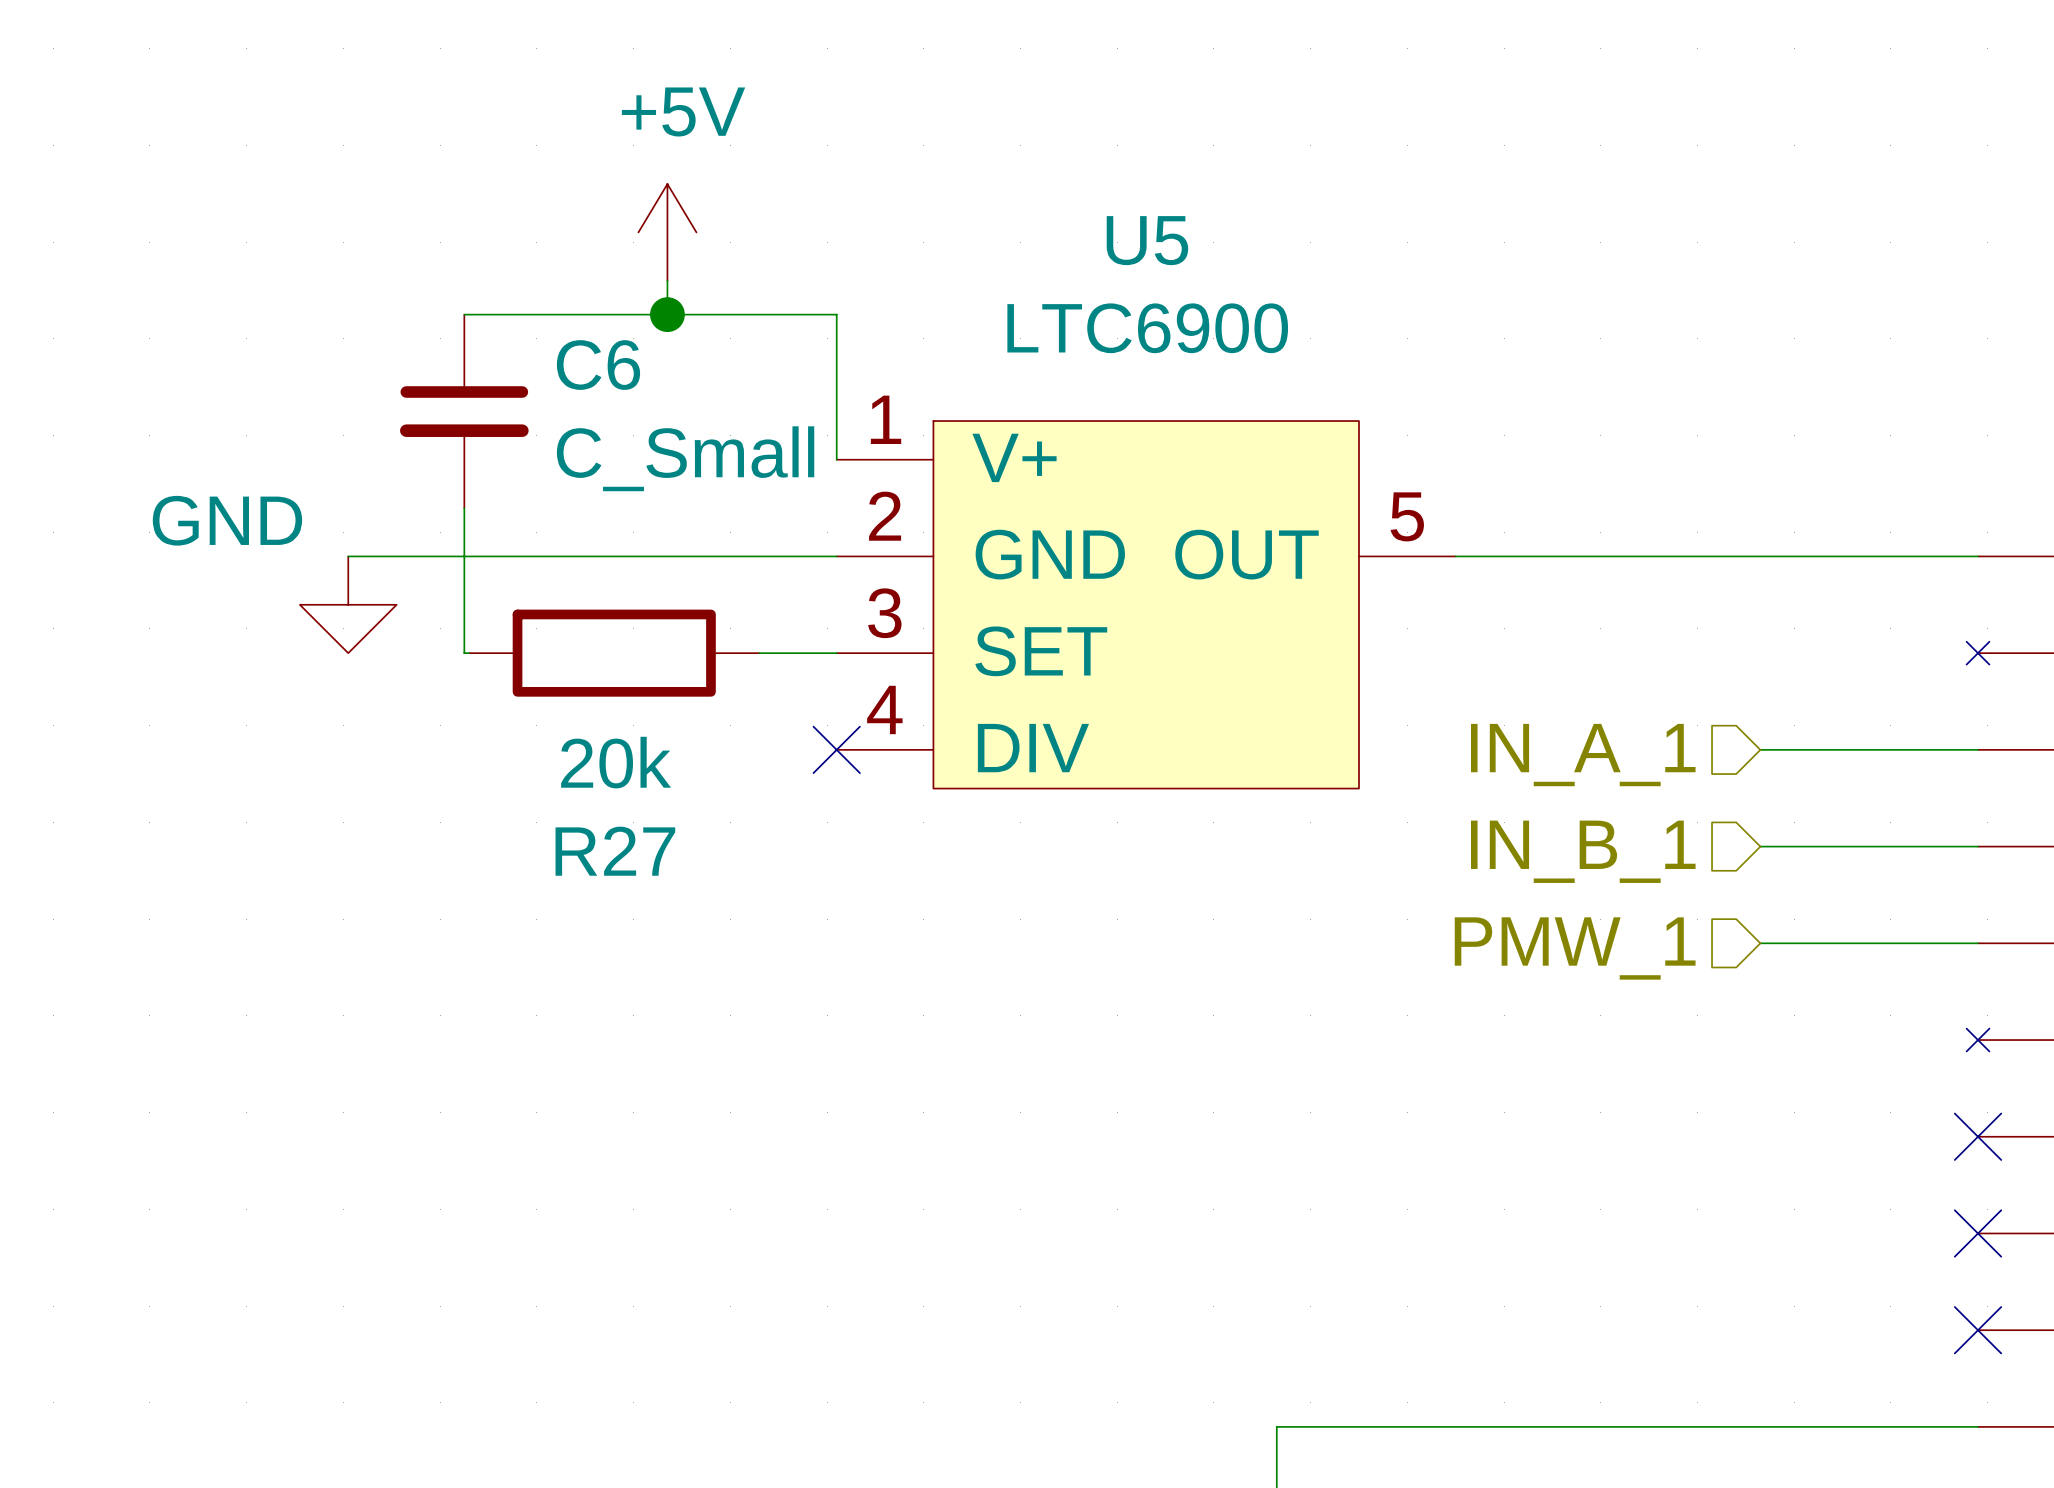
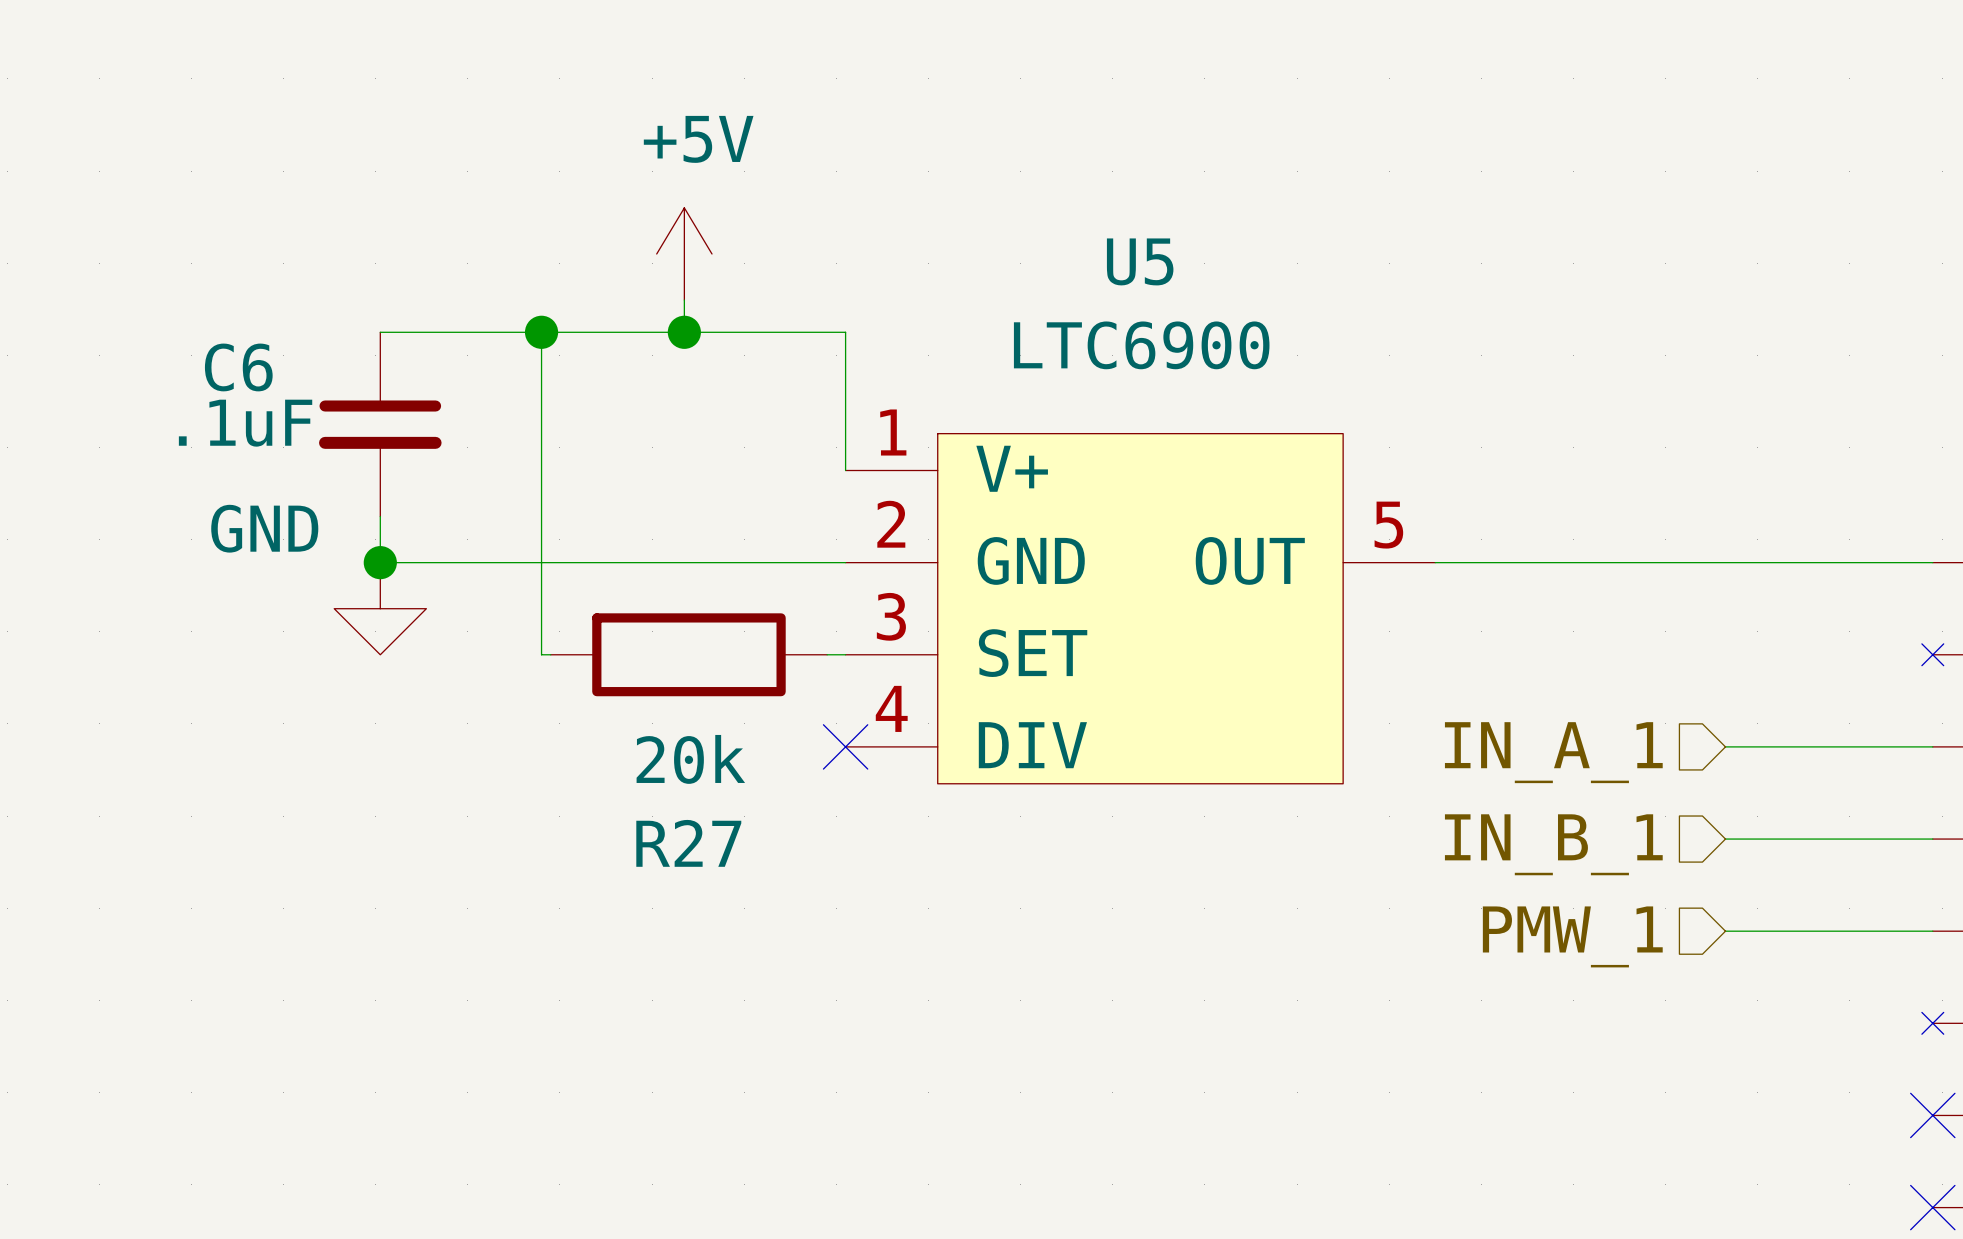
wire: none -> (380, 332) (490, 332)
wire: none -> (541, 332) (541, 654) (550, 654)
junction: none -> (541, 332)
C6 name position: C6 (598, 365) -> C6 (238, 367)
C6 position: (464, 411) -> (380, 424)
C6 value: C_Small (685, 458) -> .1uF (245, 423)
wire: none -> (380, 516) (380, 562)
wire: (464, 508) (464, 653) (469, 653) -> none
junction: none -> (380, 562)
R27 position: (614, 653) -> (688, 654)

